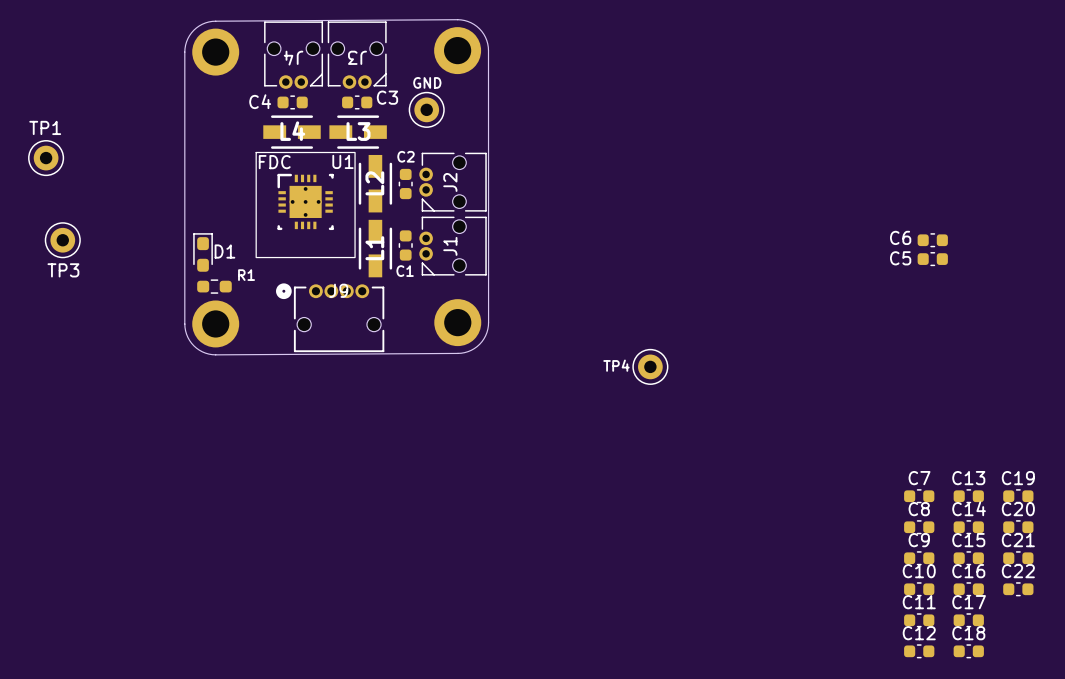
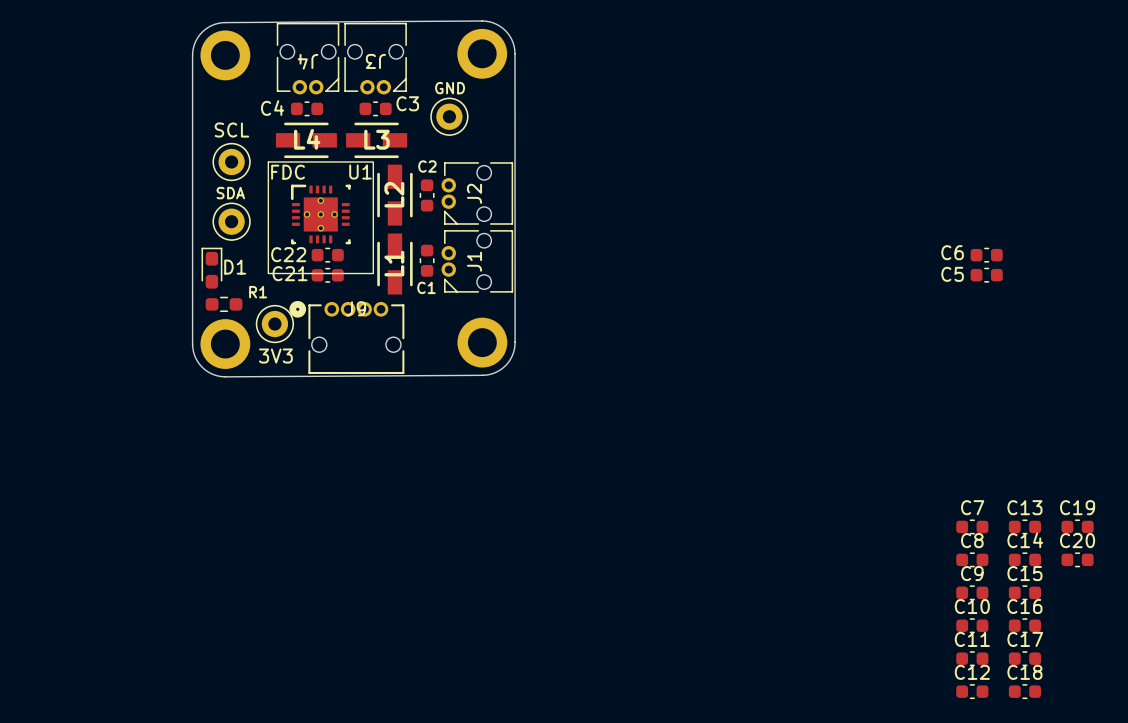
SCL: none -> (231, 161)
TP1: (46, 158) -> none
SDA: none -> (231, 221)
TP3: (62, 240) -> none
3V3: none -> (274, 324)
TP4: (650, 366) -> none
C21 name position: C21 (1018, 540) -> C21 (289, 273)
C21 position: (1018, 558) -> (327, 275)
C22 name position: C22 (1018, 571) -> C22 (288, 254)
C22 position: (1018, 589) -> (327, 255)

